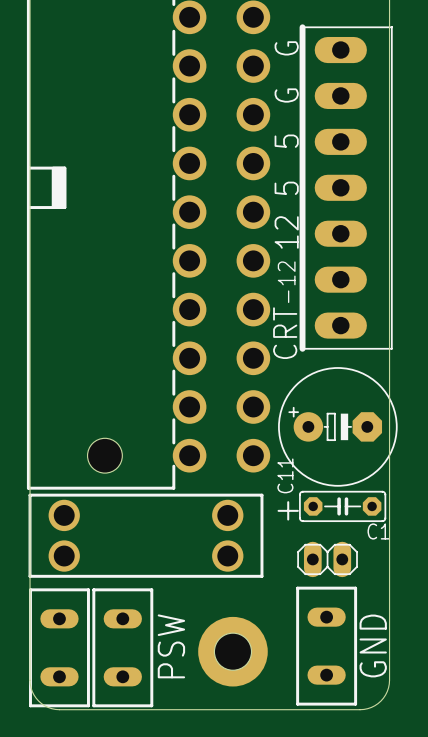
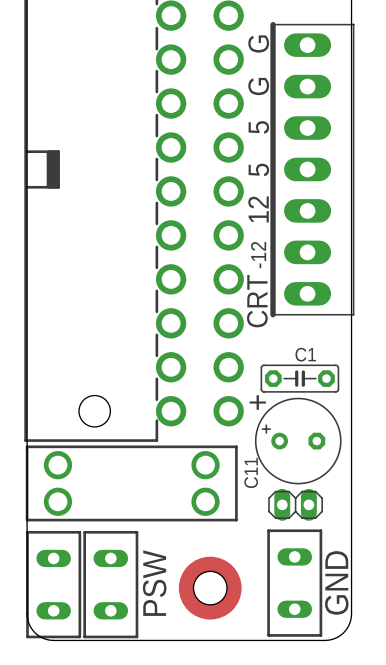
C11 footprint: [278, 367, 398, 487] -> [254, 397, 342, 485]
C1 position: (342, 506) -> (299, 378)
text position: + (288, 510) -> + (257, 402)
C1 name position: C1 (378, 531) -> C1 (305, 354)

